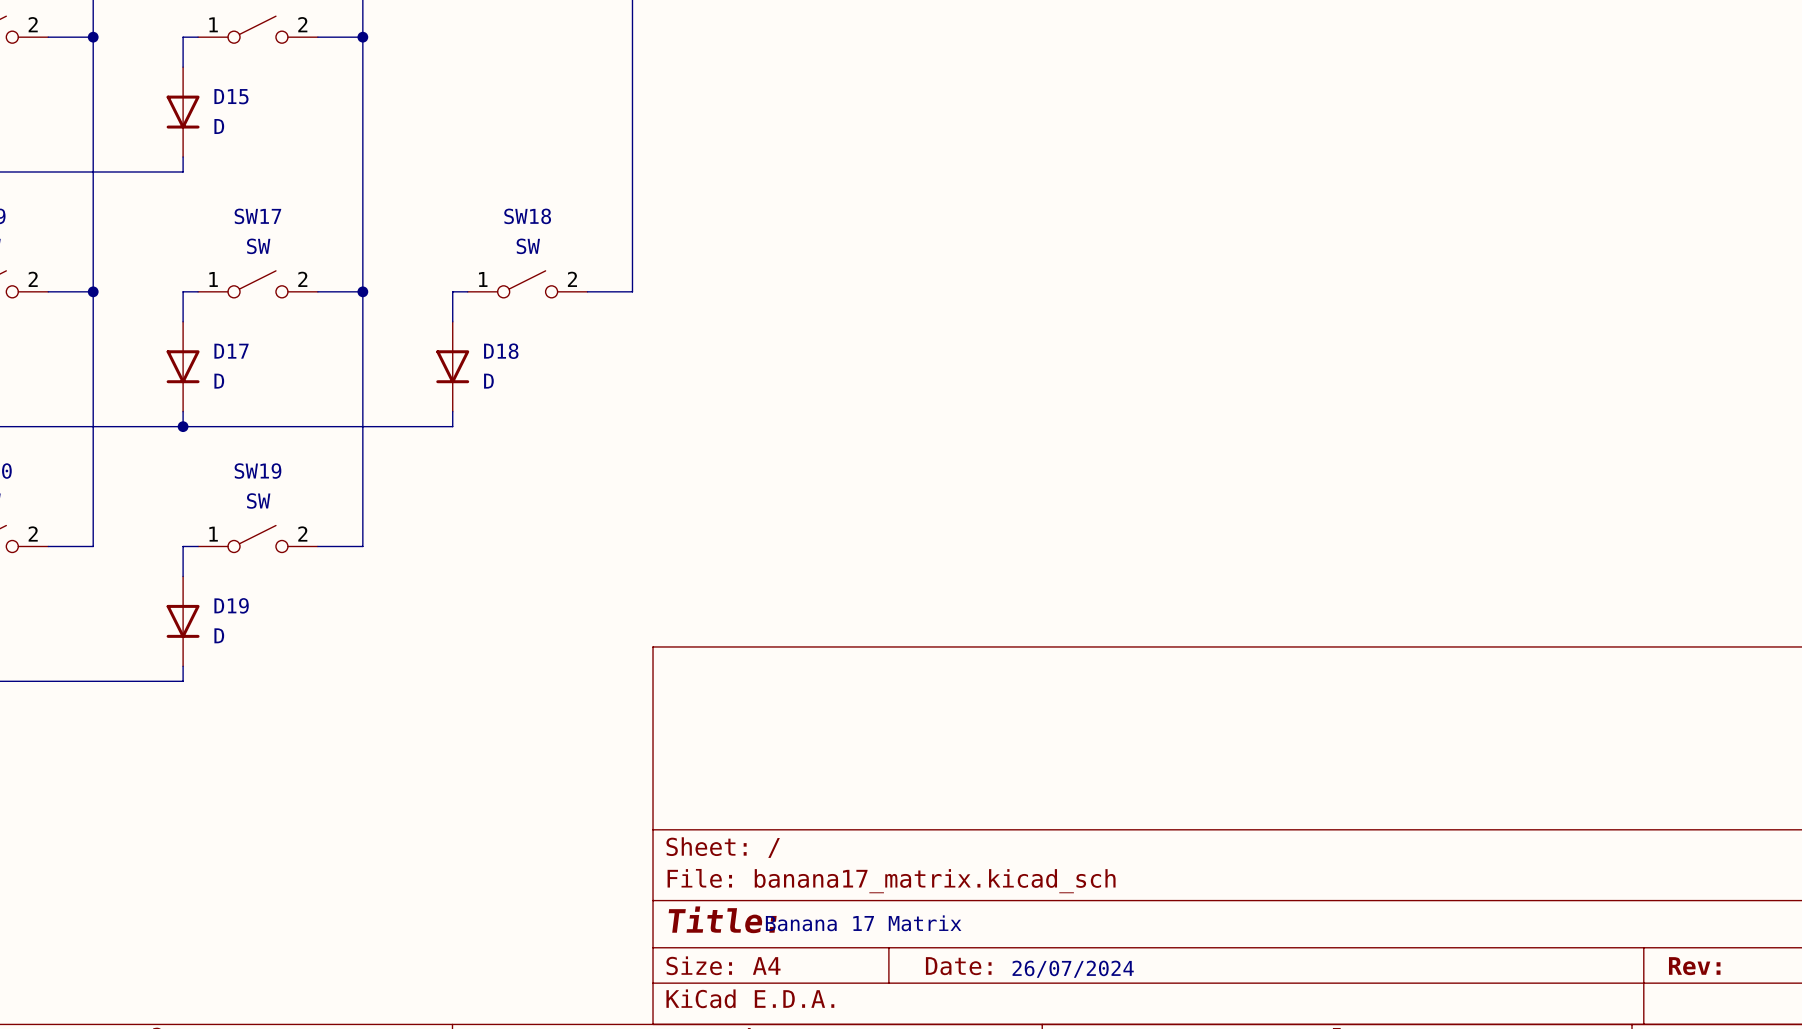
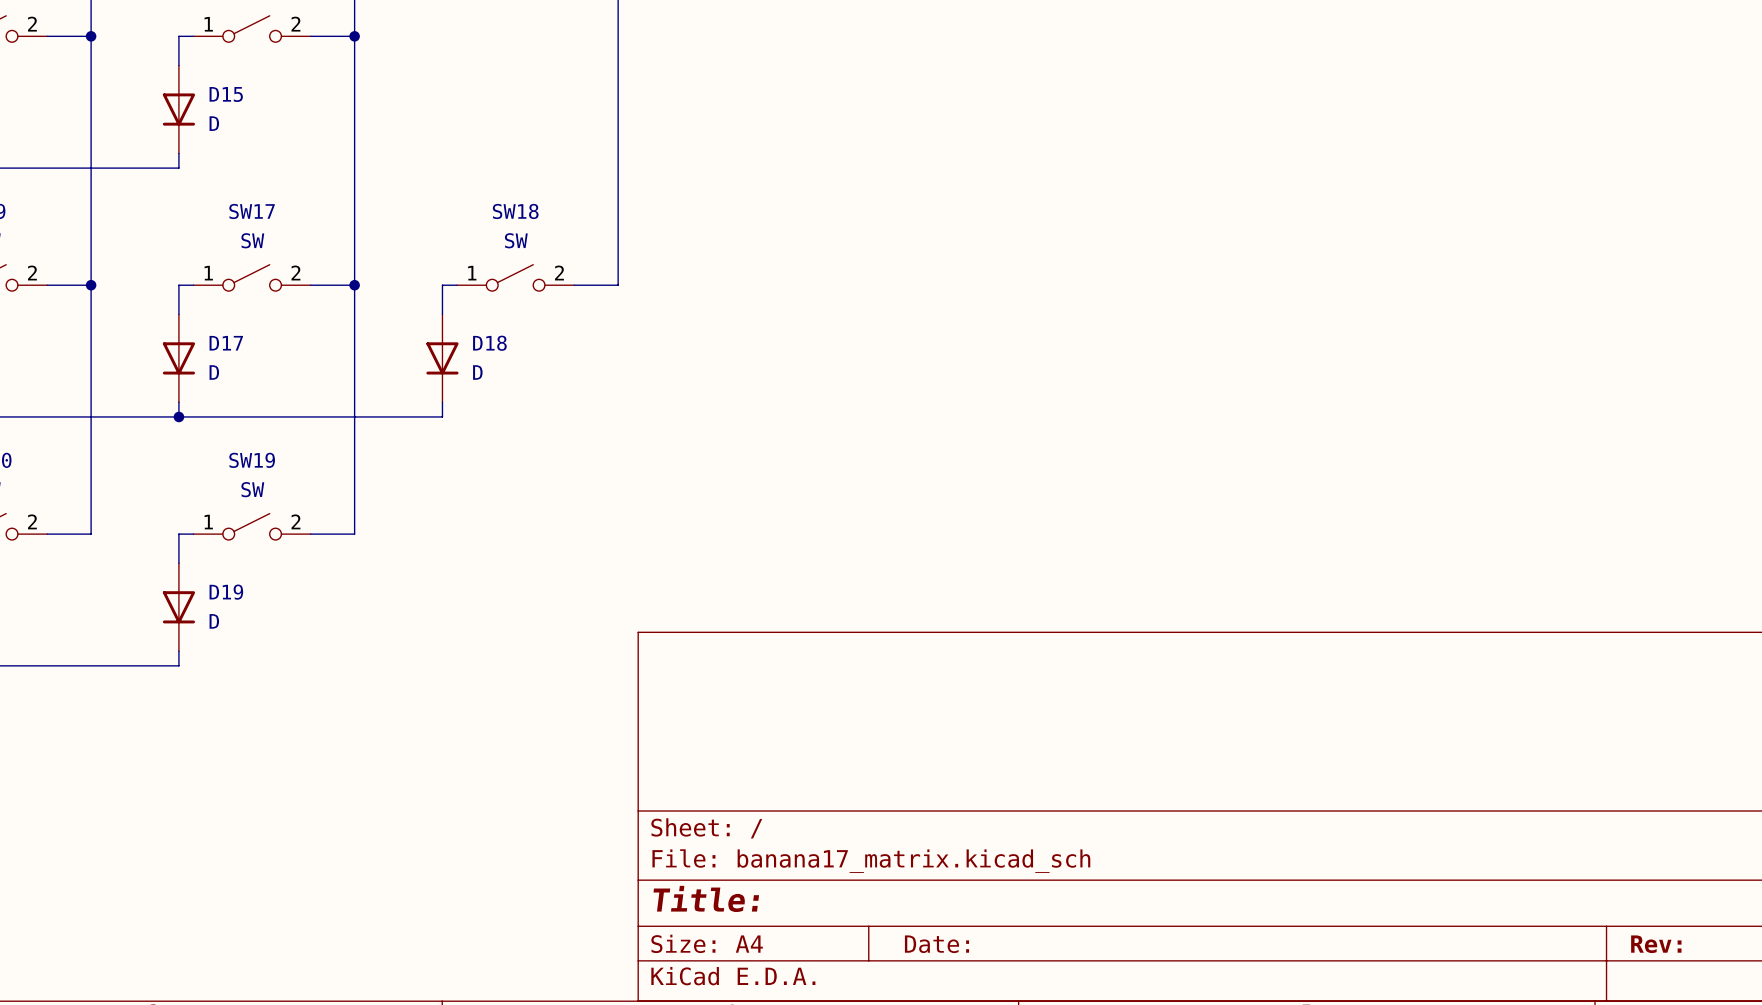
text: Banana 17 Matrix (863, 923) -> none
text: 26/07/2024 (1073, 969) -> none

